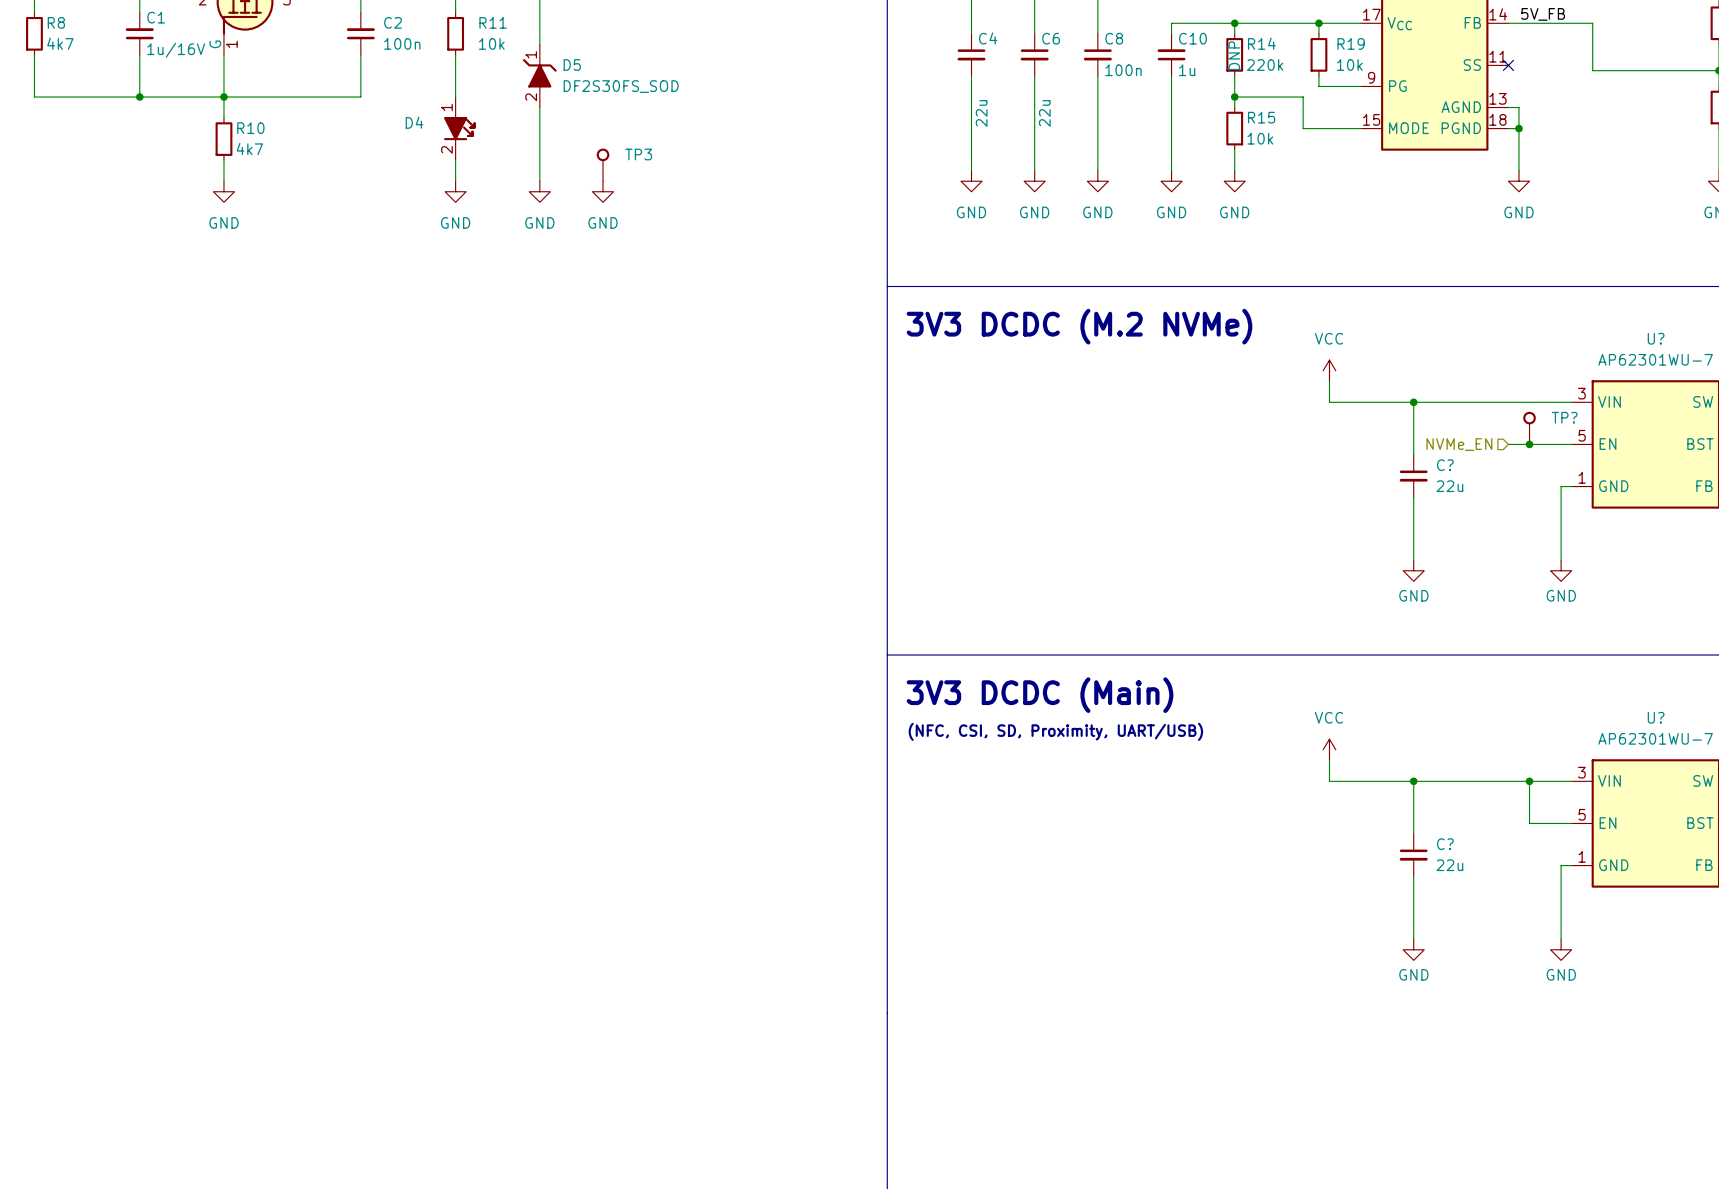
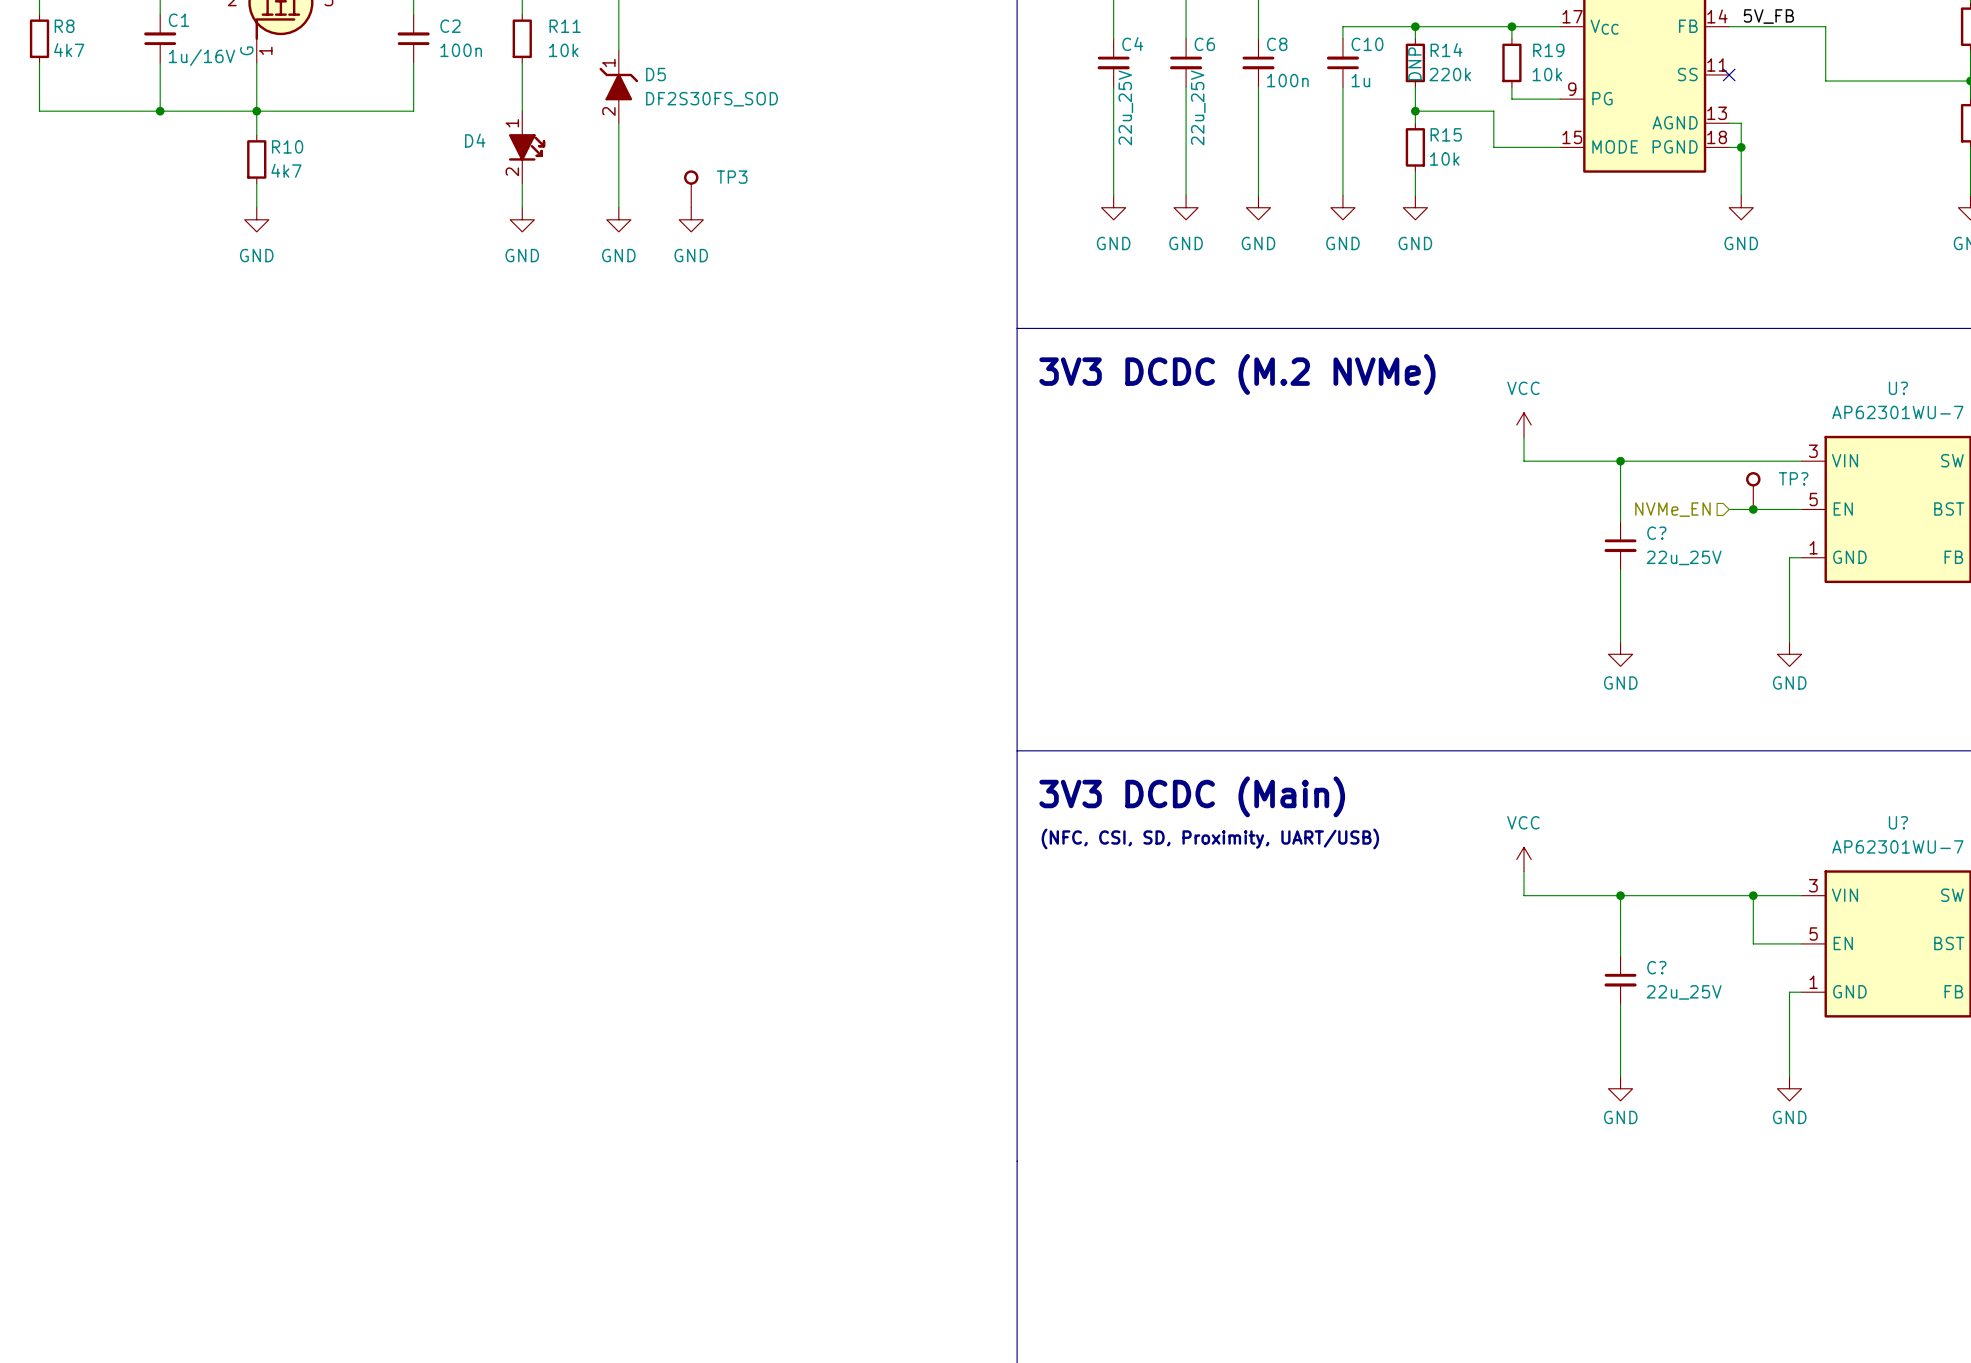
C4 text: 22u (981, 113) -> 22u_25V (1125, 107)
C6 text: 22u (1044, 113) -> 22u_25V (1198, 107)
C? text: 22u (1449, 486) -> 22u_25V (1684, 557)
C? text: 22u (1449, 865) -> 22u_25V (1684, 992)

